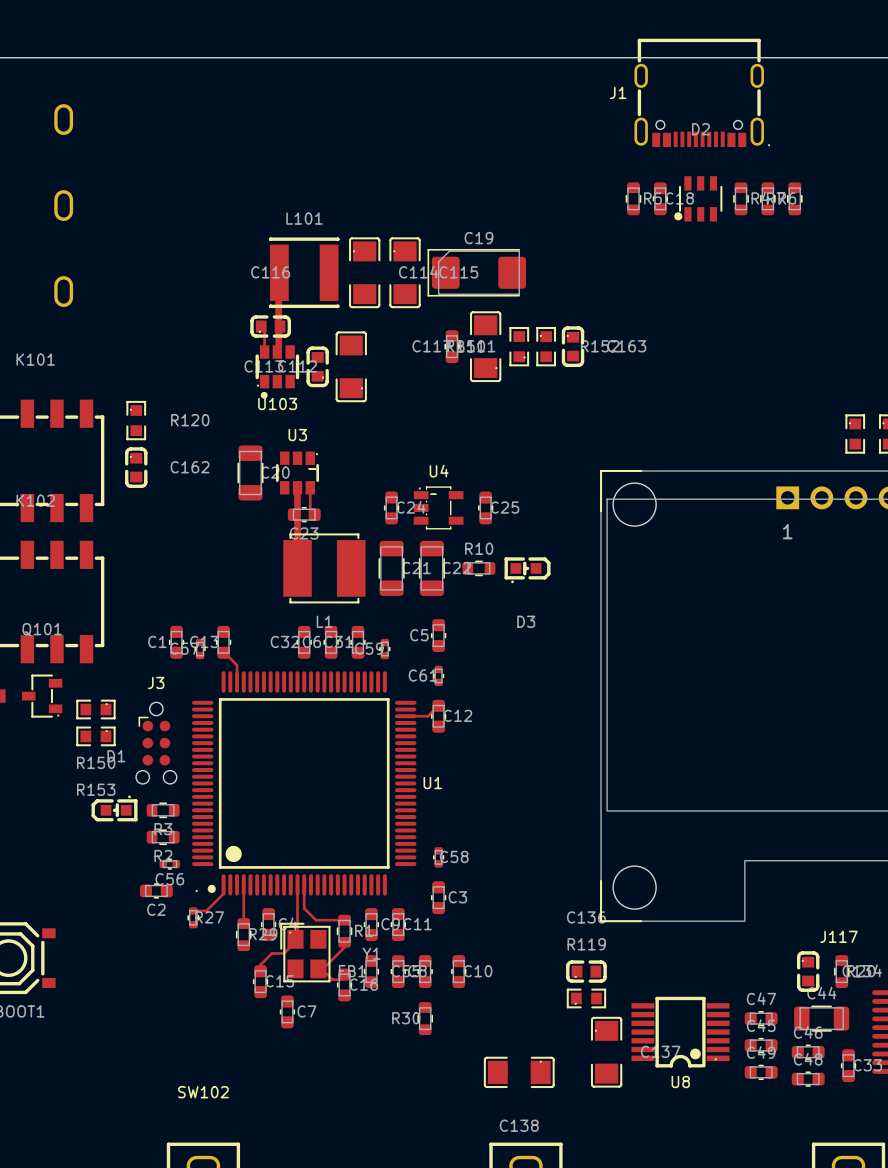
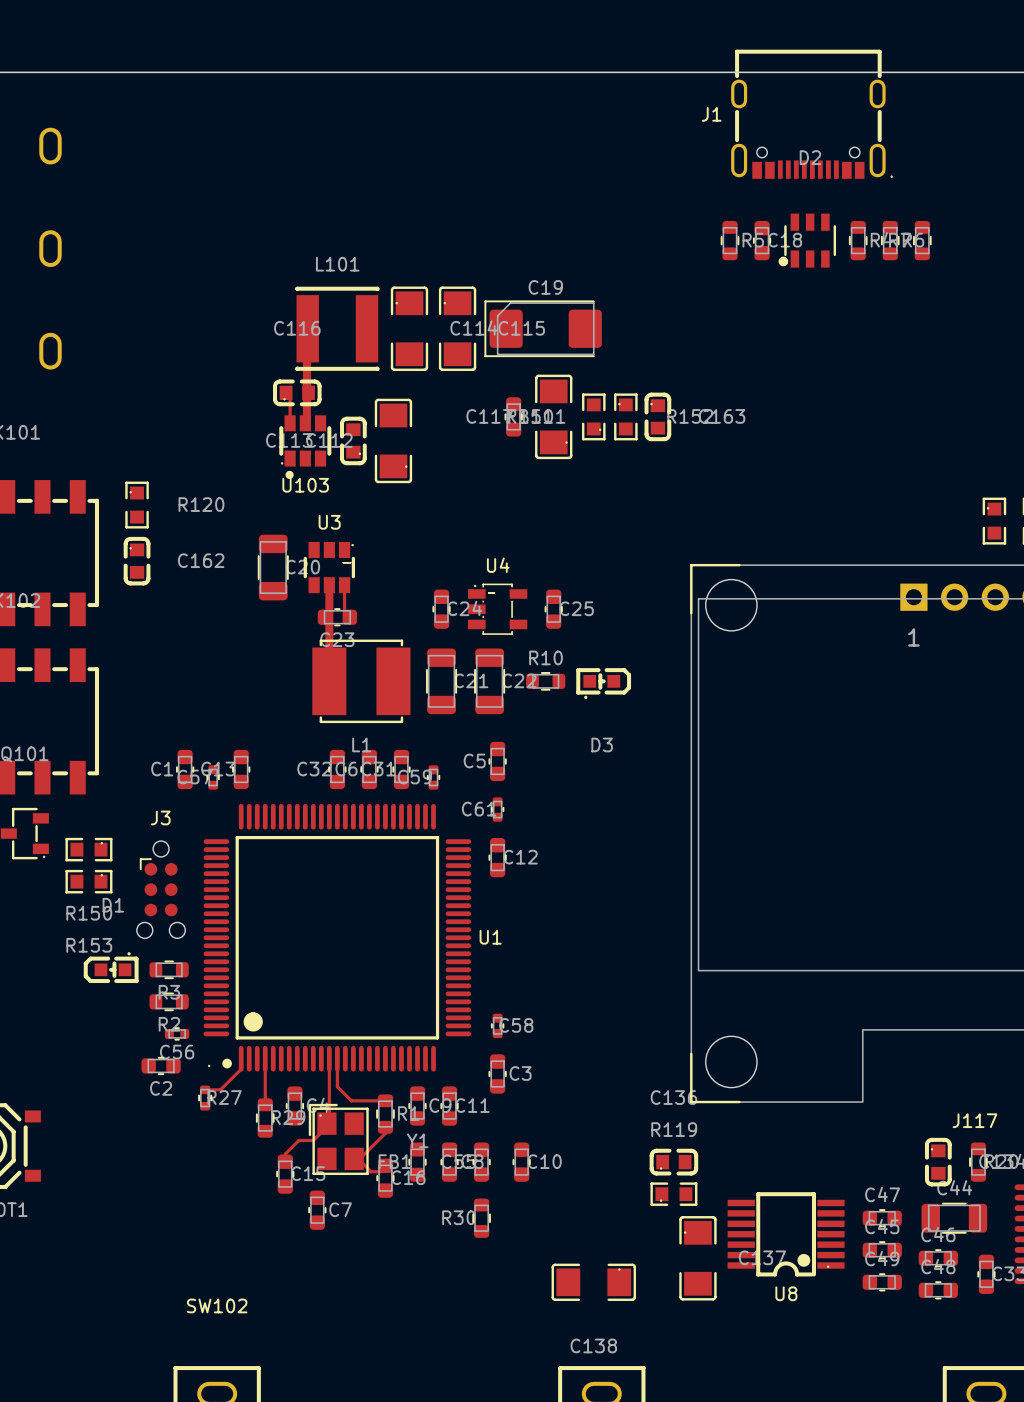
top track: (227, 655) (237, 665) (237, 671) -> none
top track: (438, 705) (427, 716) (414, 716) -> none

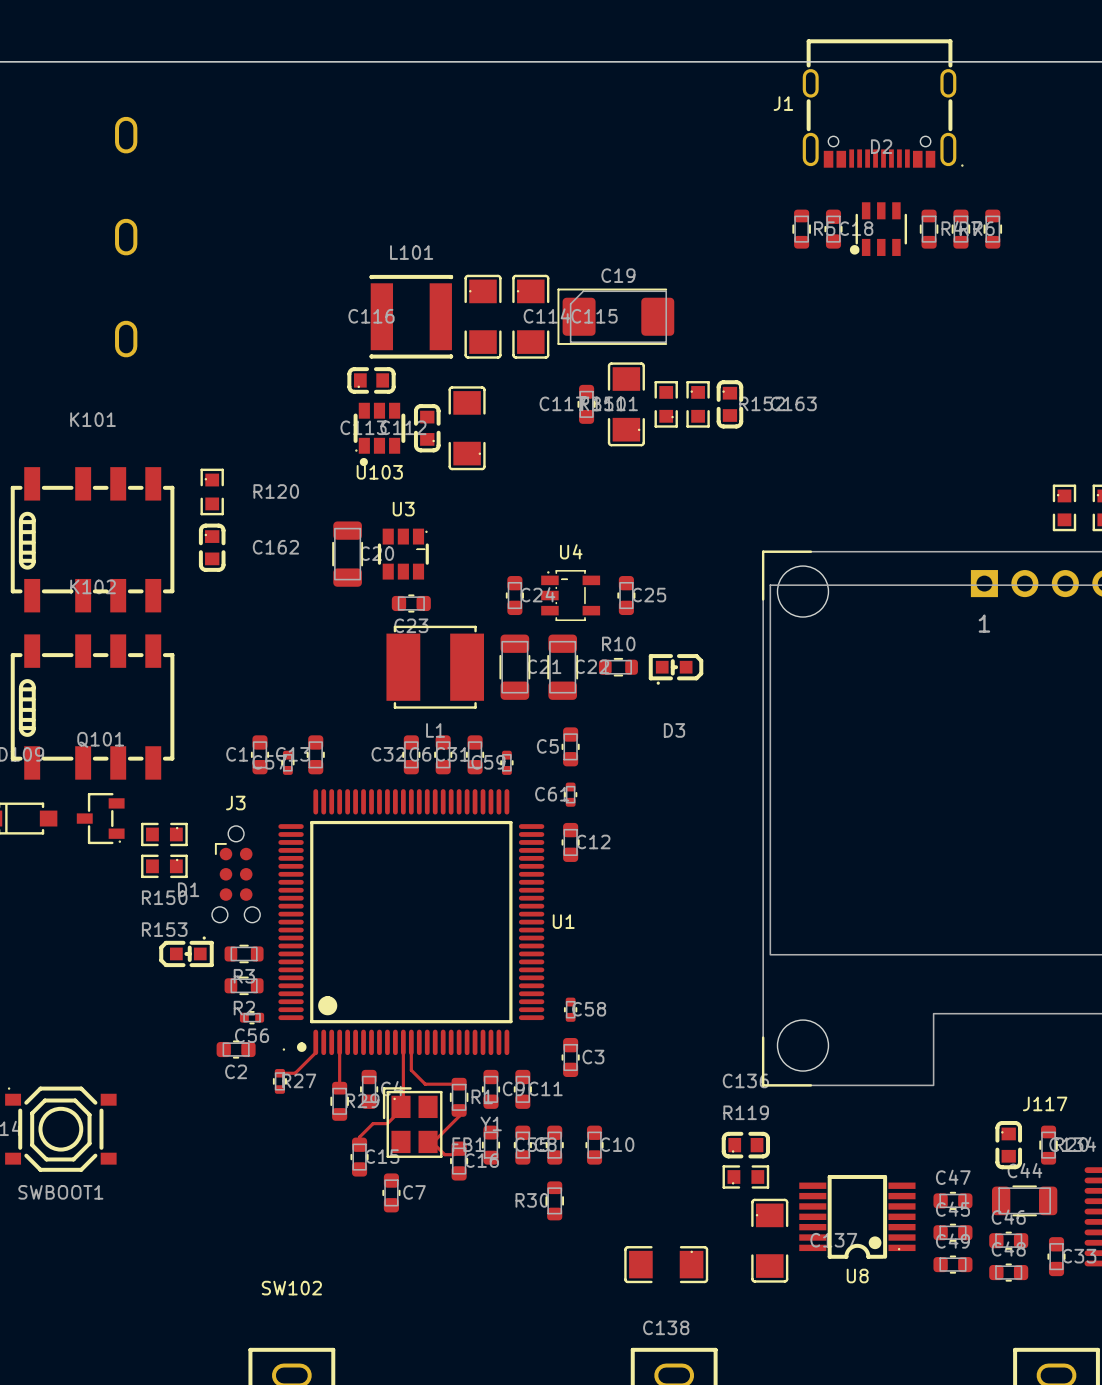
top track: (306, 357) (306, 418) -> none
top track: (286, 392) (290, 396) (290, 418) -> none
top track: (329, 589) (329, 652) -> none
top track: (344, 589) (344, 612) (349, 617) -> none

